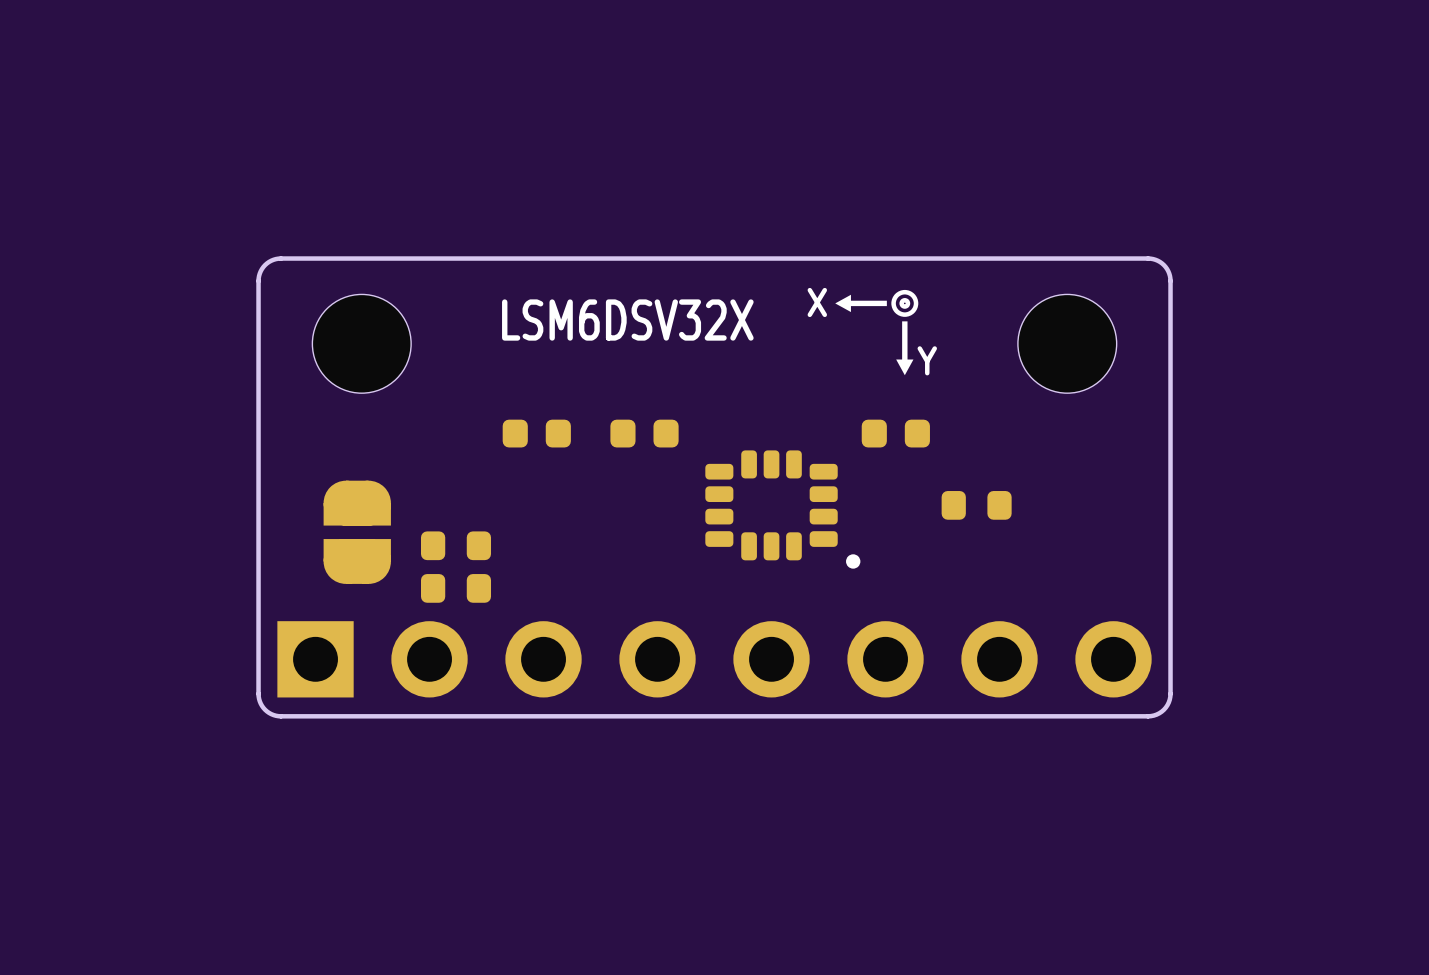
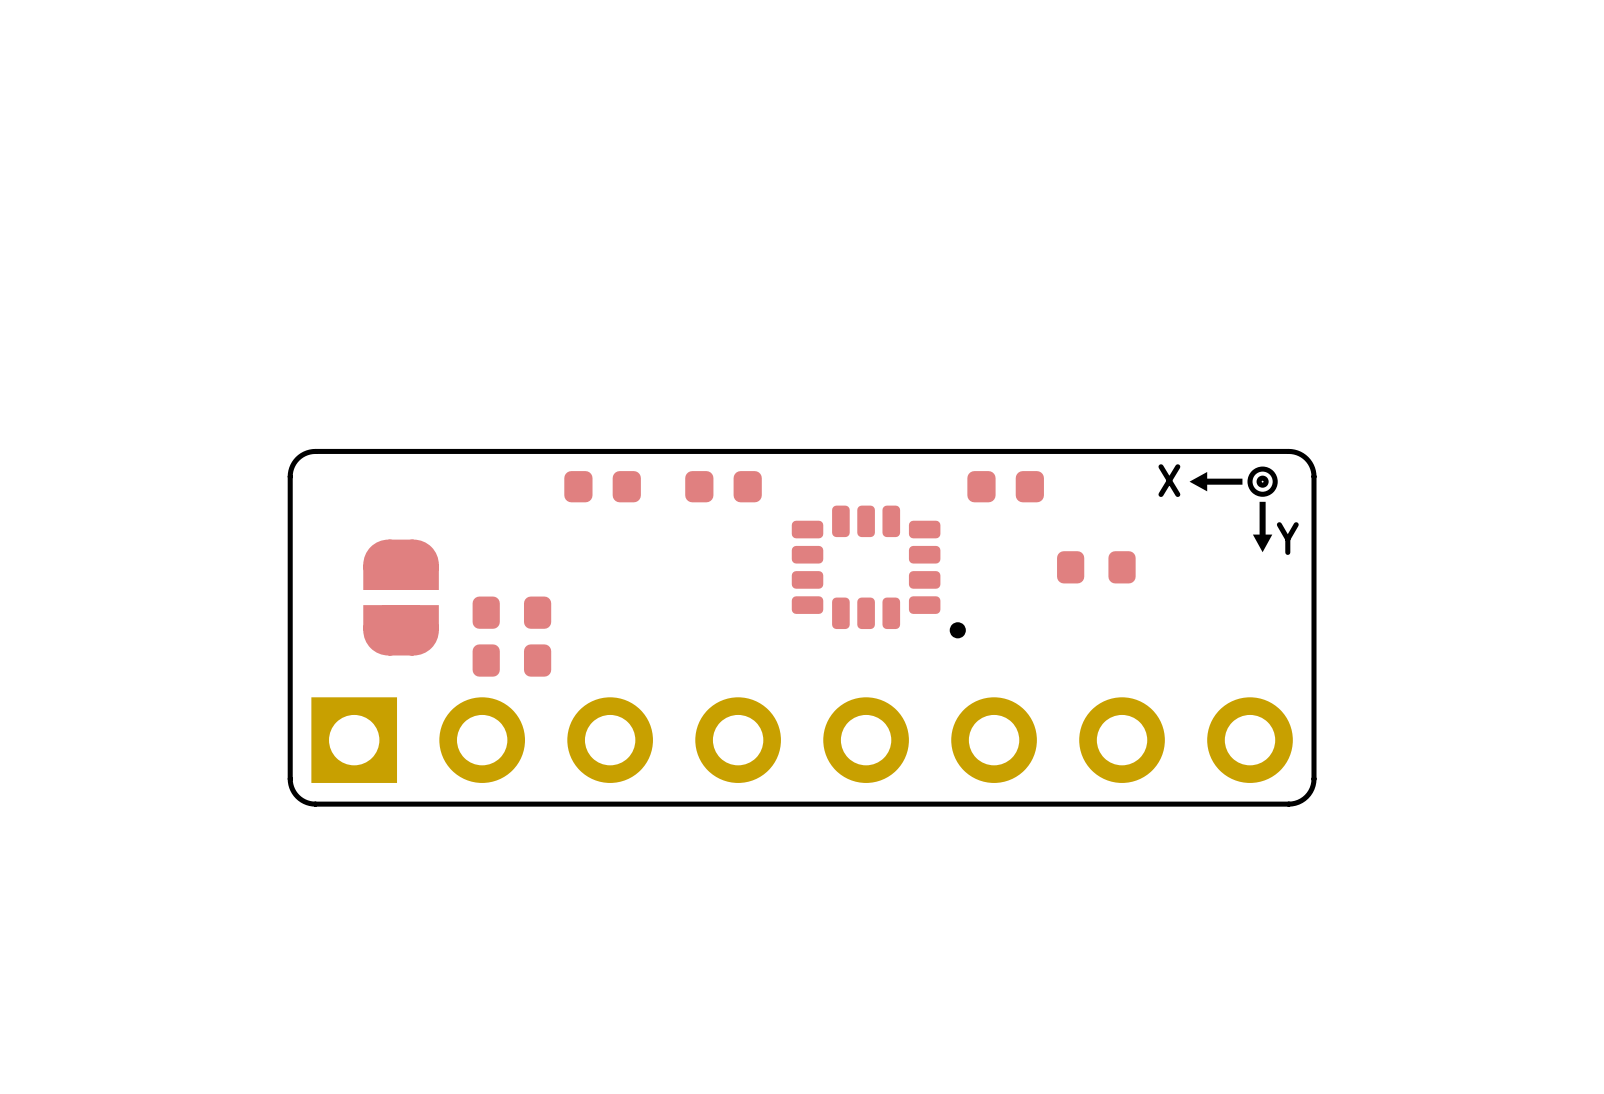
drawing: [835, 294, 914, 376] -> none
text position: X (817, 302) -> X (1169, 480)
drawing position: (904, 303) -> (1262, 481)
drawing position: (904, 303) -> (1262, 481)
text: LSM6DSV32X (627, 320) -> none
part: (361, 343) -> none
part: (1067, 343) -> none
text position: Y (927, 360) -> Y (1287, 538)
drawing: none -> [1189, 471, 1273, 553]
board edge: (258, 424) (258, 278) (265, 265) (271, 260) (280, 258) (1153, 259) (1163, 265) (1170, 278) (1170, 424) -> (290, 476) (292, 465) (297, 458) (307, 452) (315, 451) (1288, 451) (1297, 452) (1306, 458) (1311, 465) (1314, 476)

